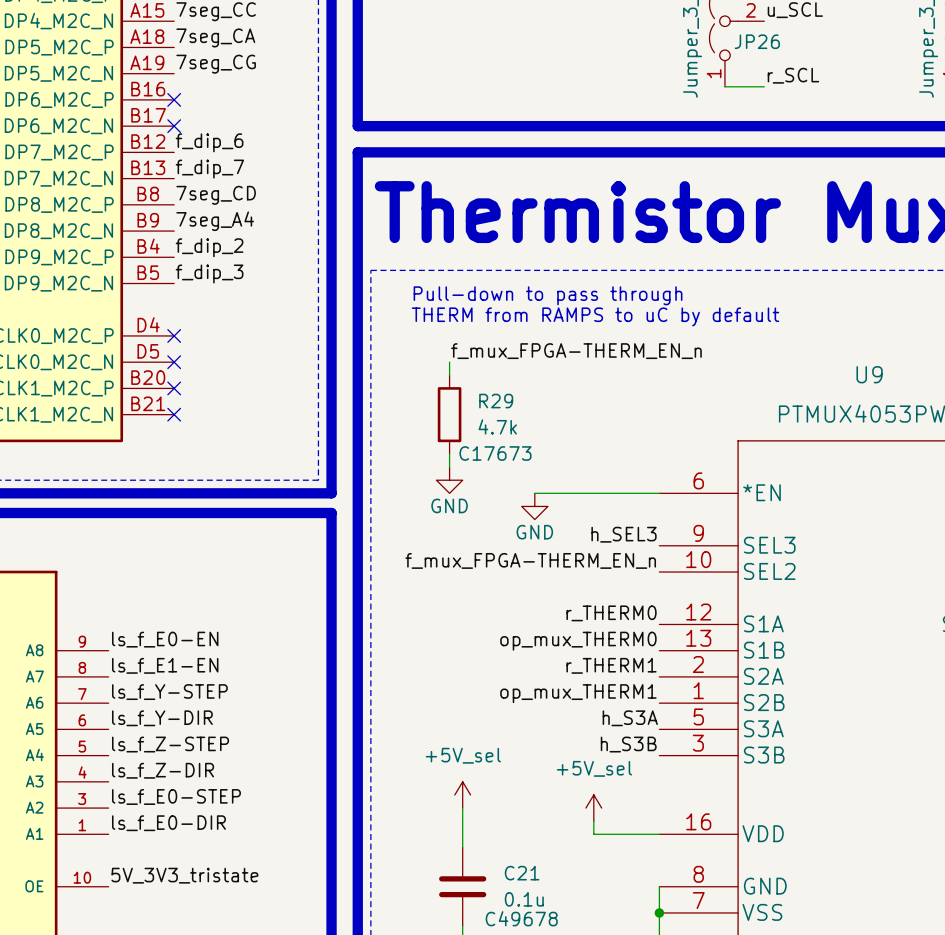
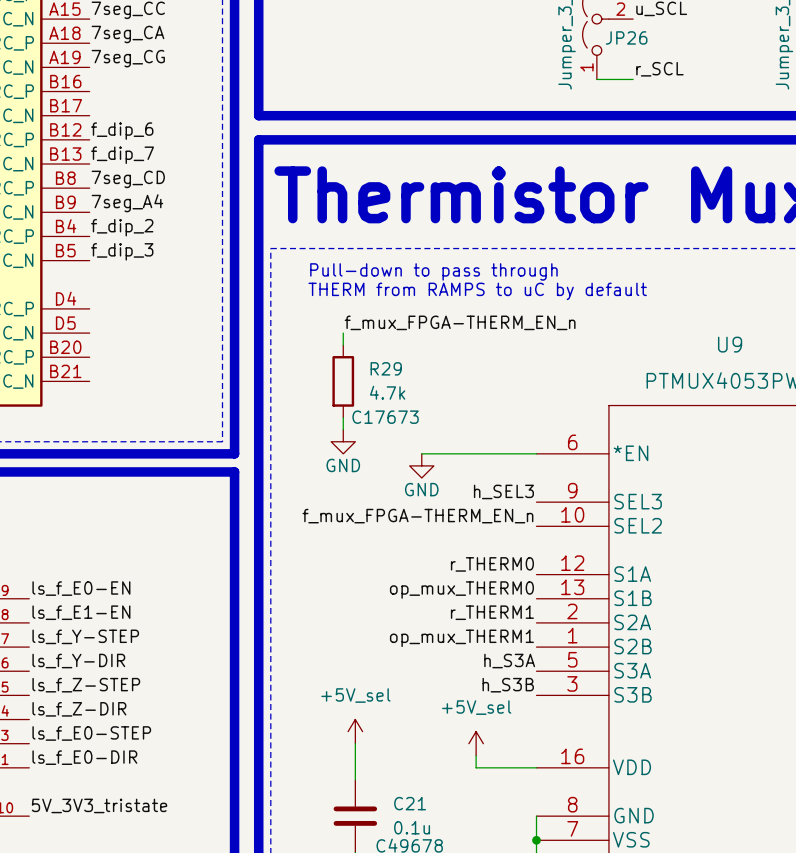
no-connect mark: (174, 99) -> none
no-connect mark: (174, 126) -> none
no-connect mark: (174, 335) -> none
no-connect mark: (174, 362) -> none
no-connect mark: (174, 388) -> none
no-connect mark: (174, 414) -> none

